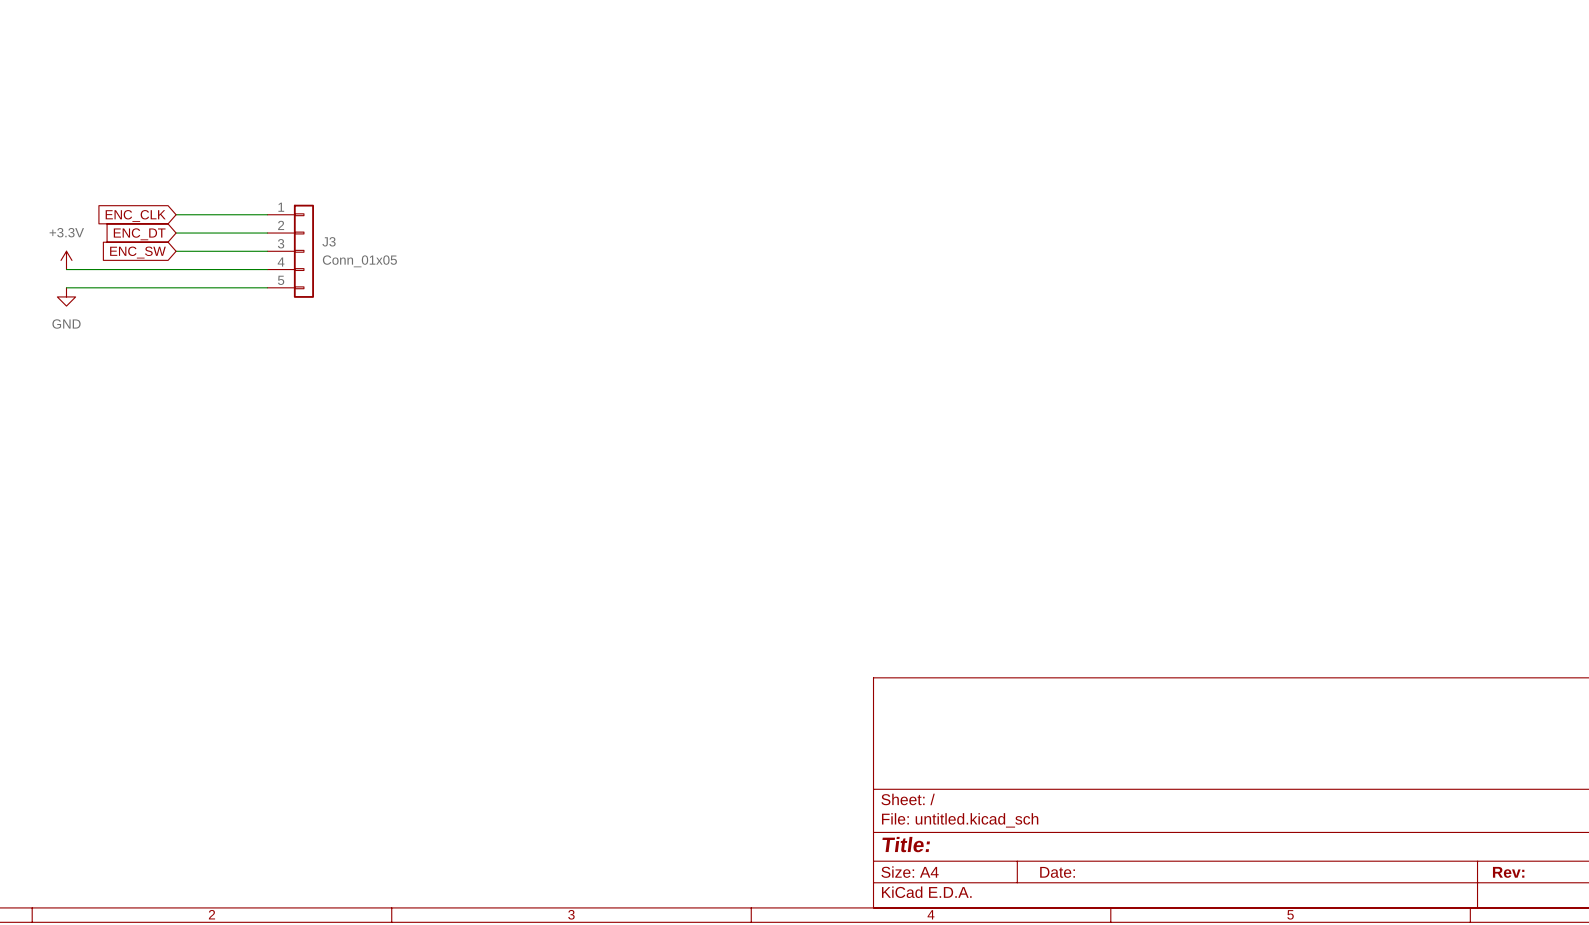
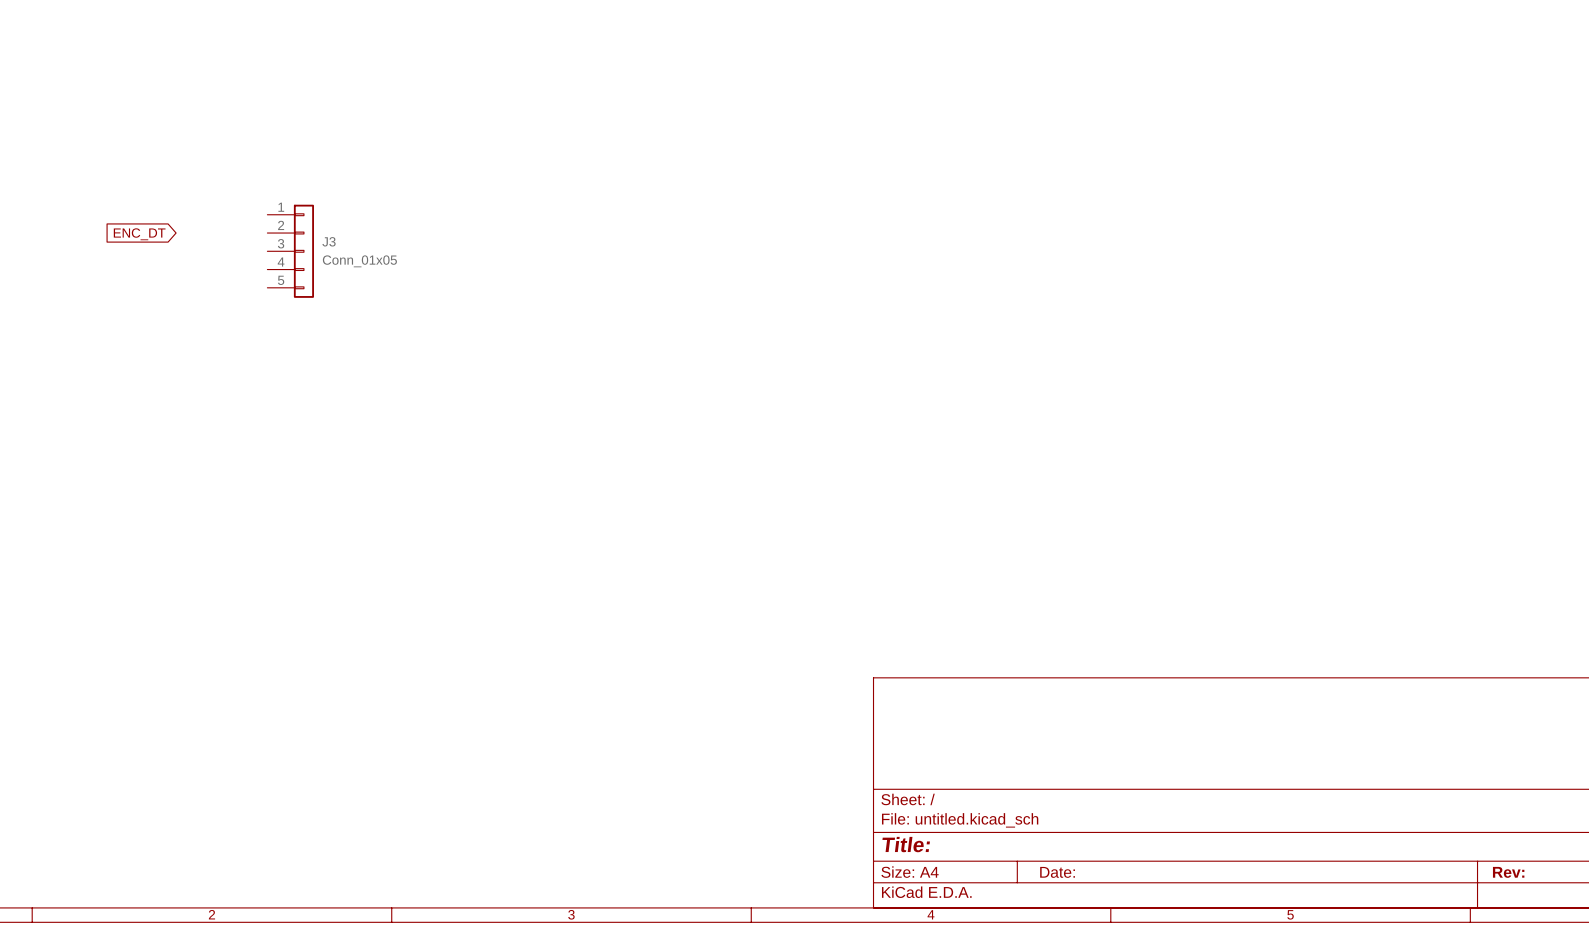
wire: (176, 214) (267, 214) -> none
global label: ENC_CLK (135, 216) -> none
wire: (176, 233) (267, 233) -> none
wire: (176, 251) (267, 251) -> none
global label: ENC_SW (137, 252) -> none
power symbol: +3.3V (66, 260) -> none
wire: (66, 269) (267, 269) -> none
wire: (66, 287) (267, 287) -> none
power symbol: GND (66, 296) -> none

